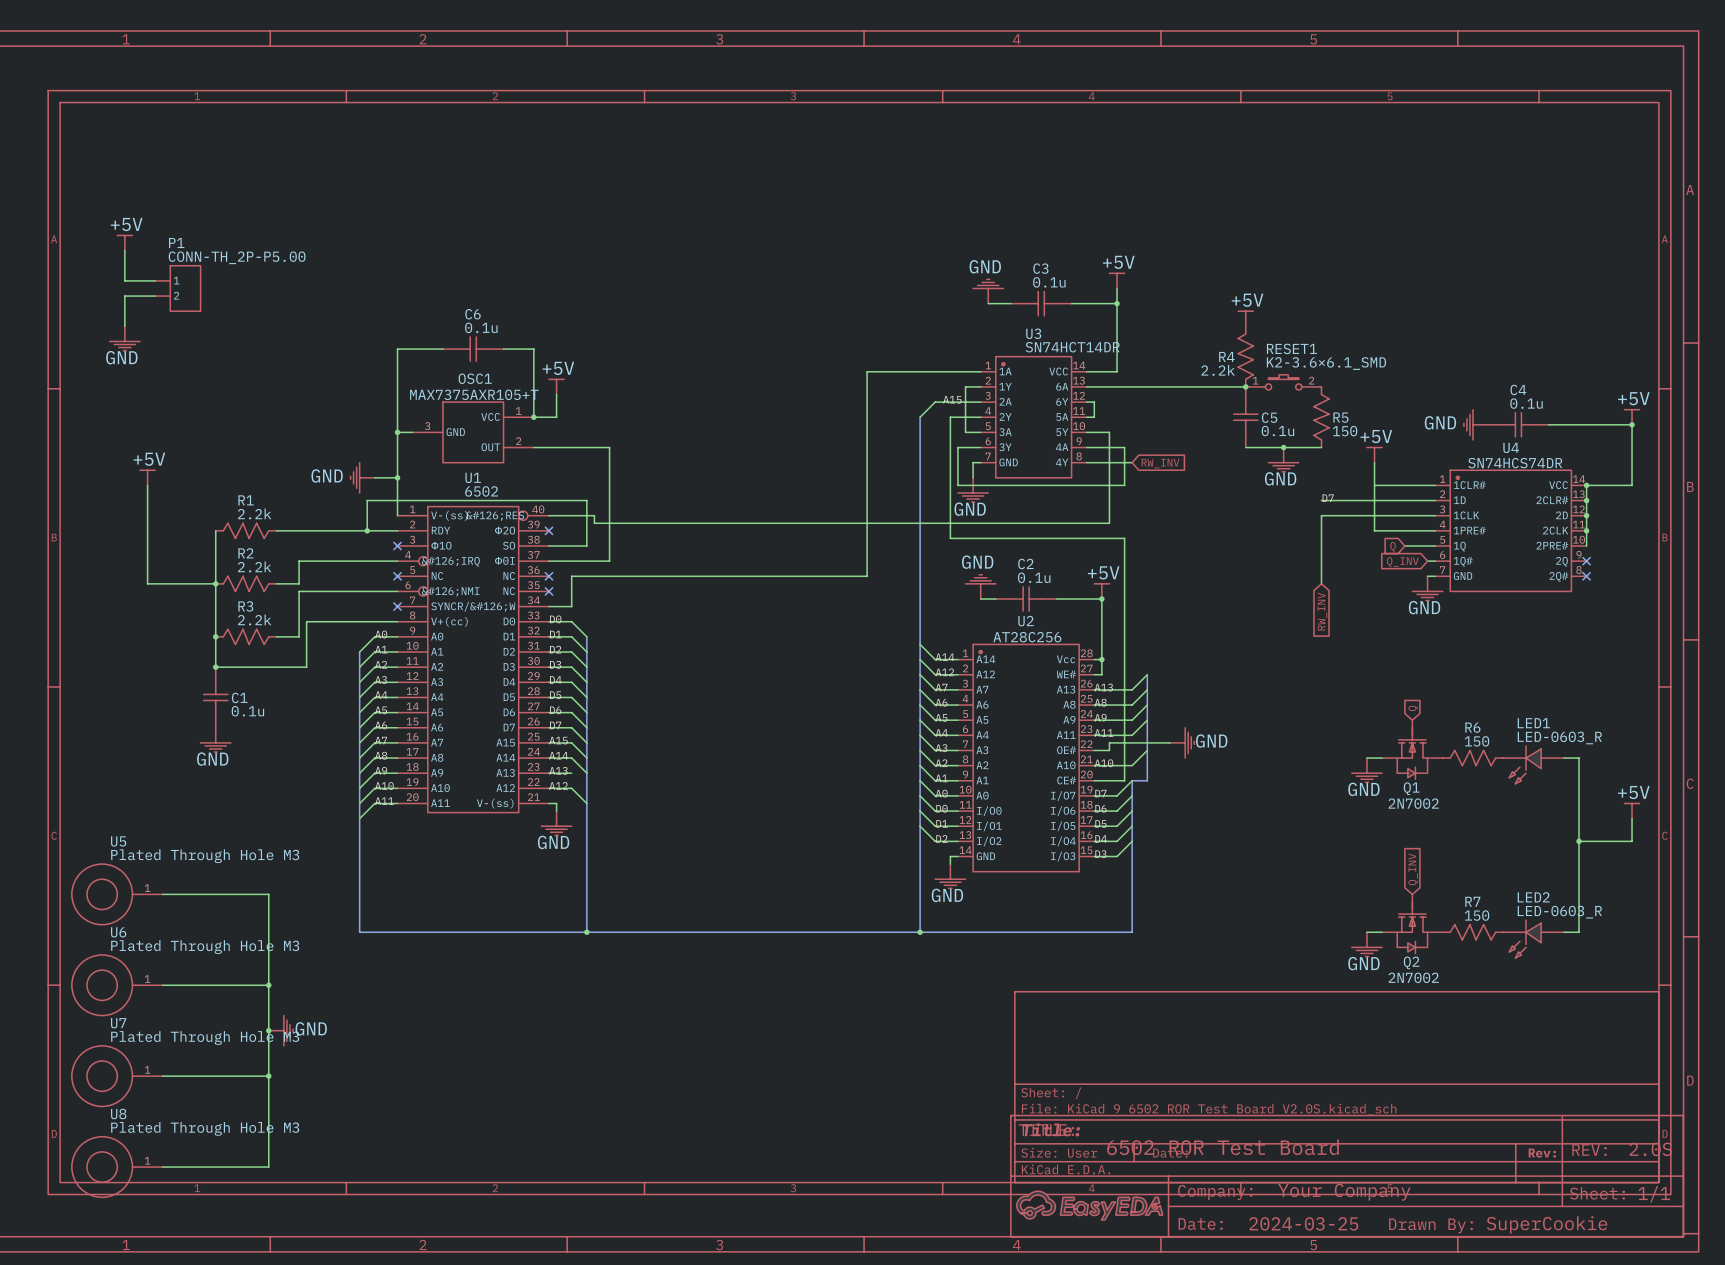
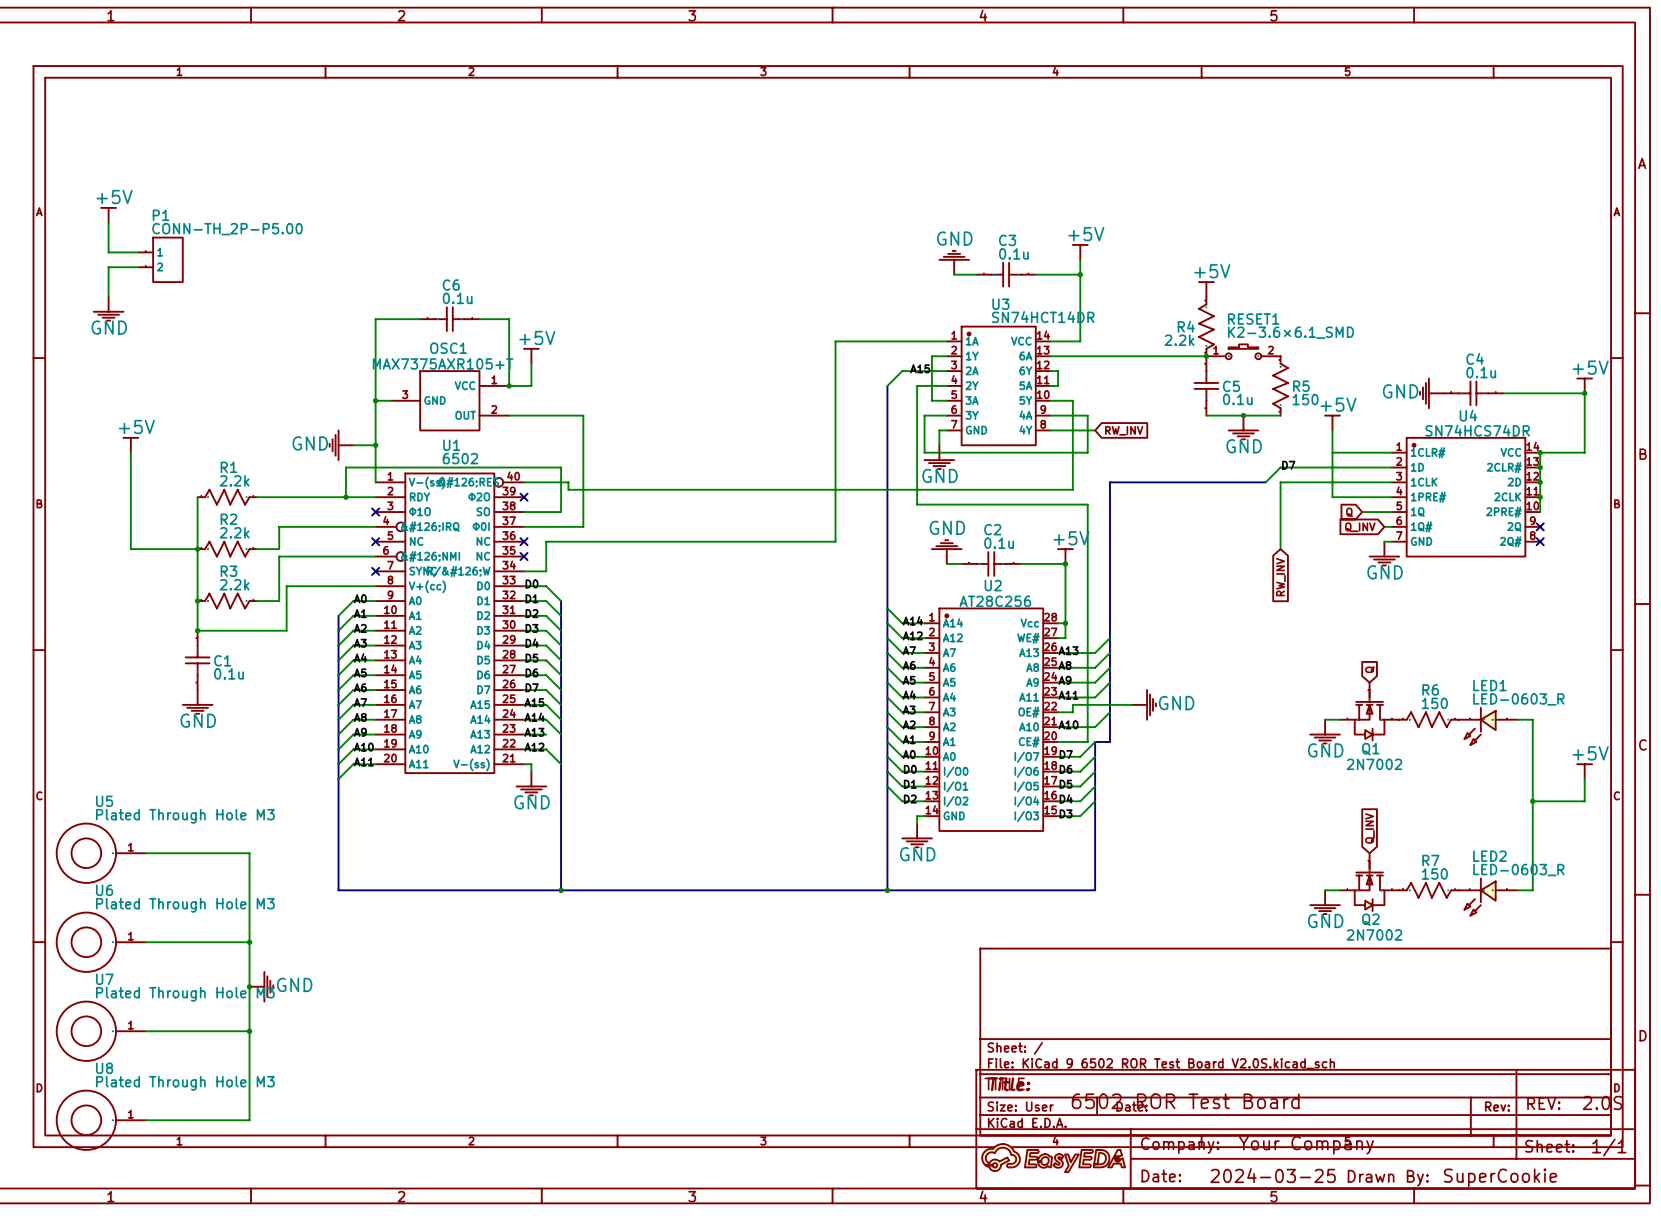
wire: none -> (1280, 467) (1265, 482)
bus: none -> (1265, 482) (1109, 482) (1109, 638)

